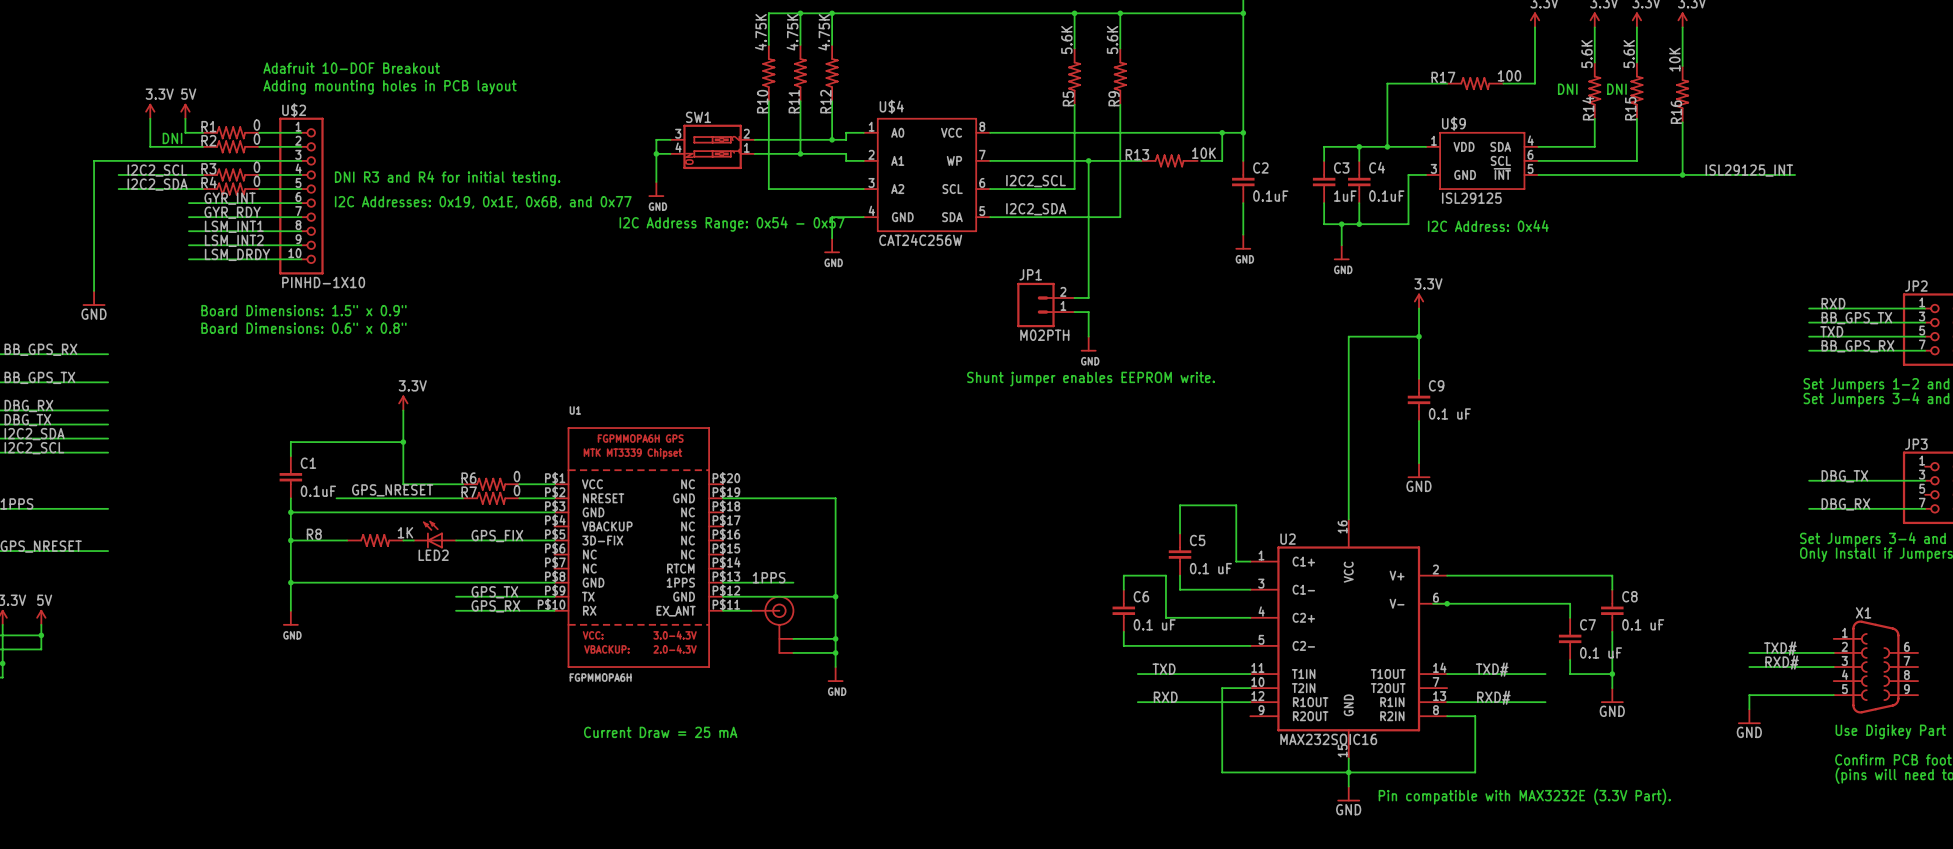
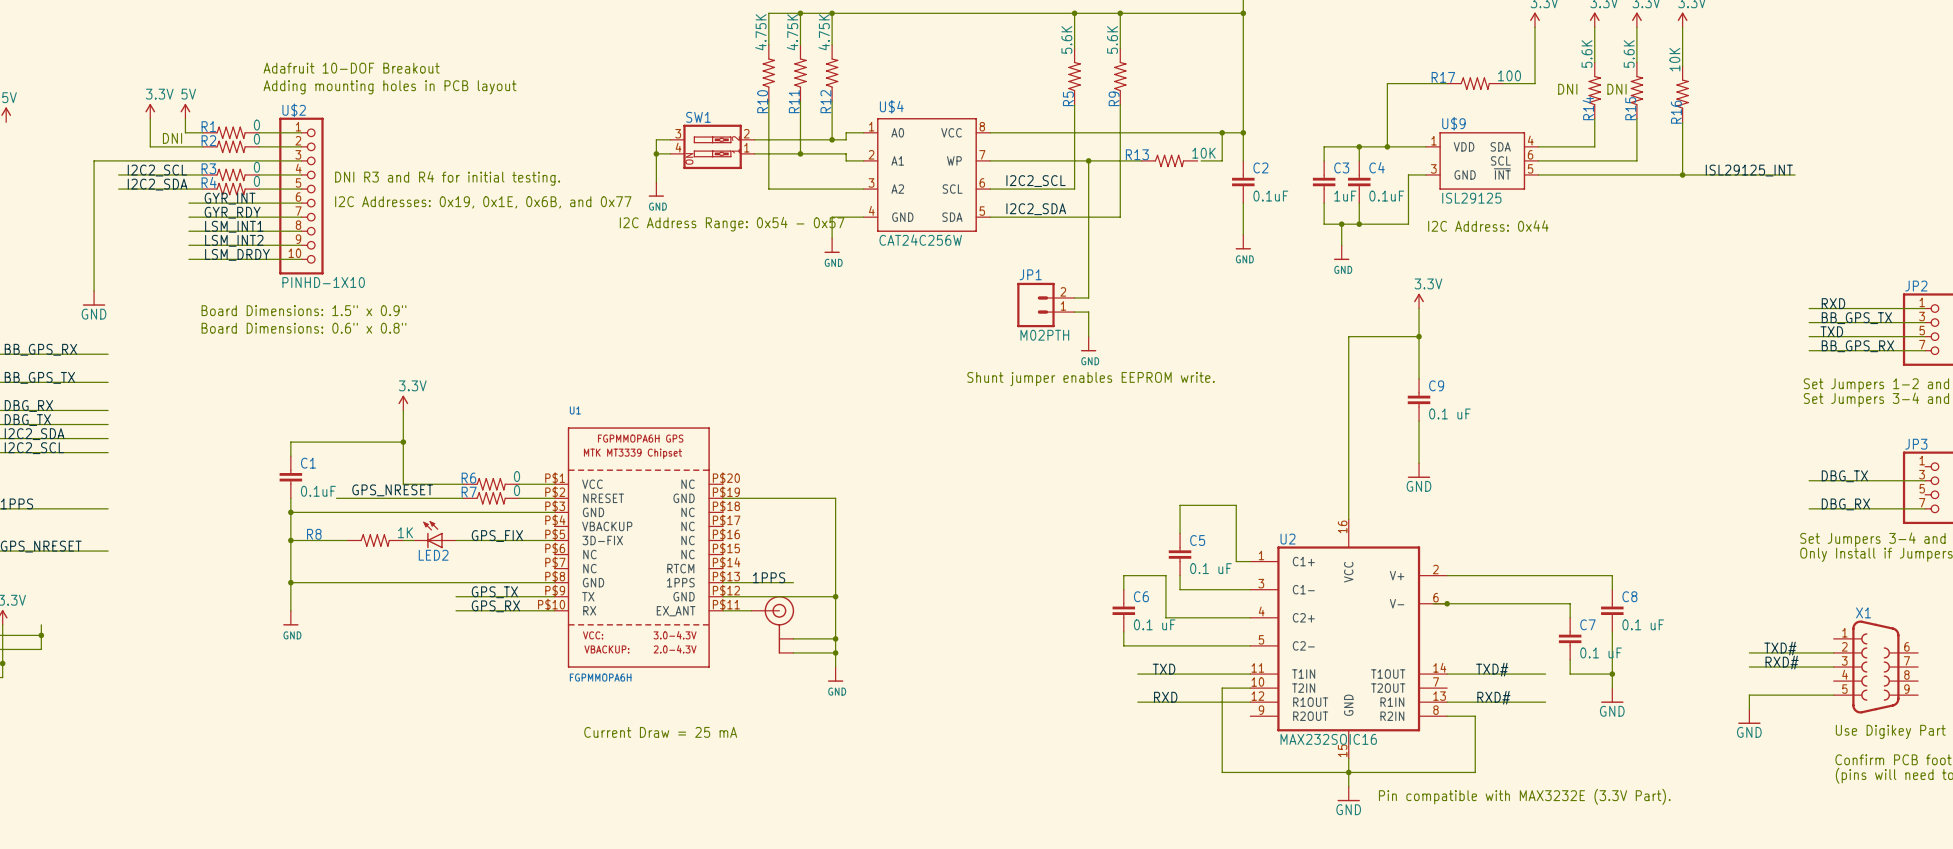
power symbol: none -> 5V (6, 114)
power symbol: 5V (41, 617) -> none

